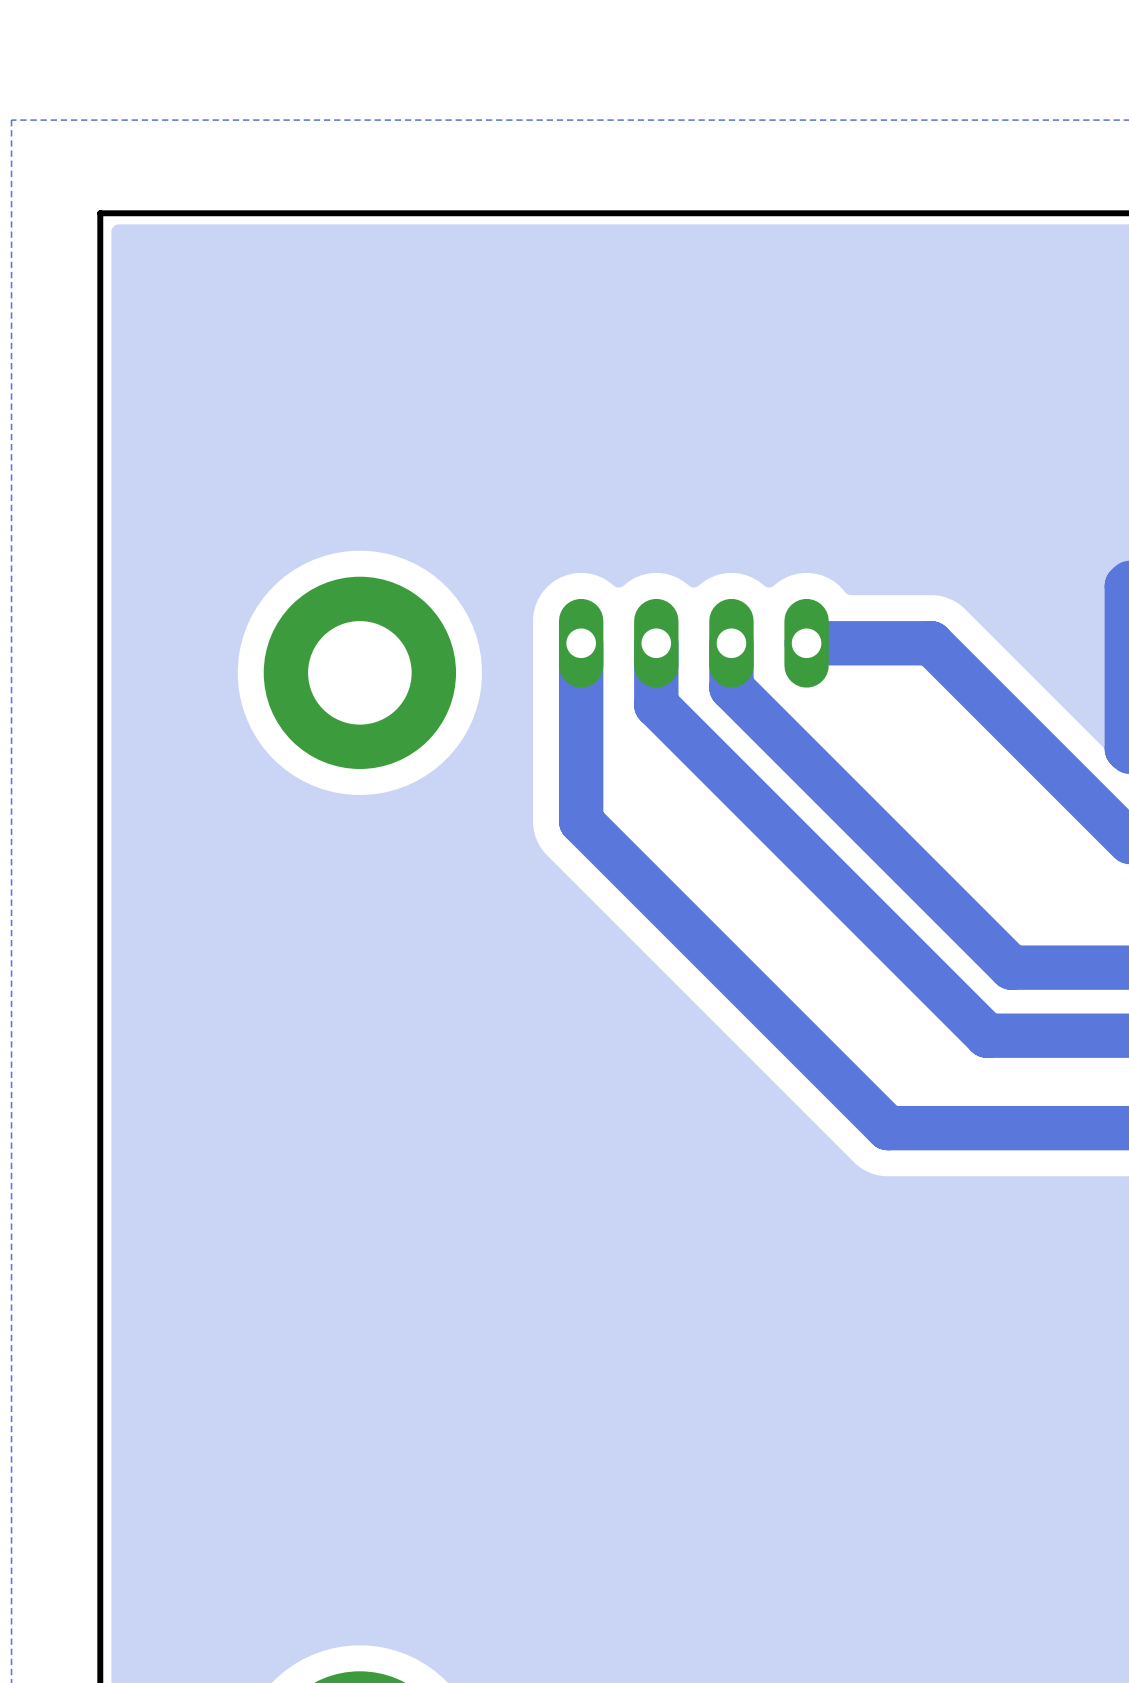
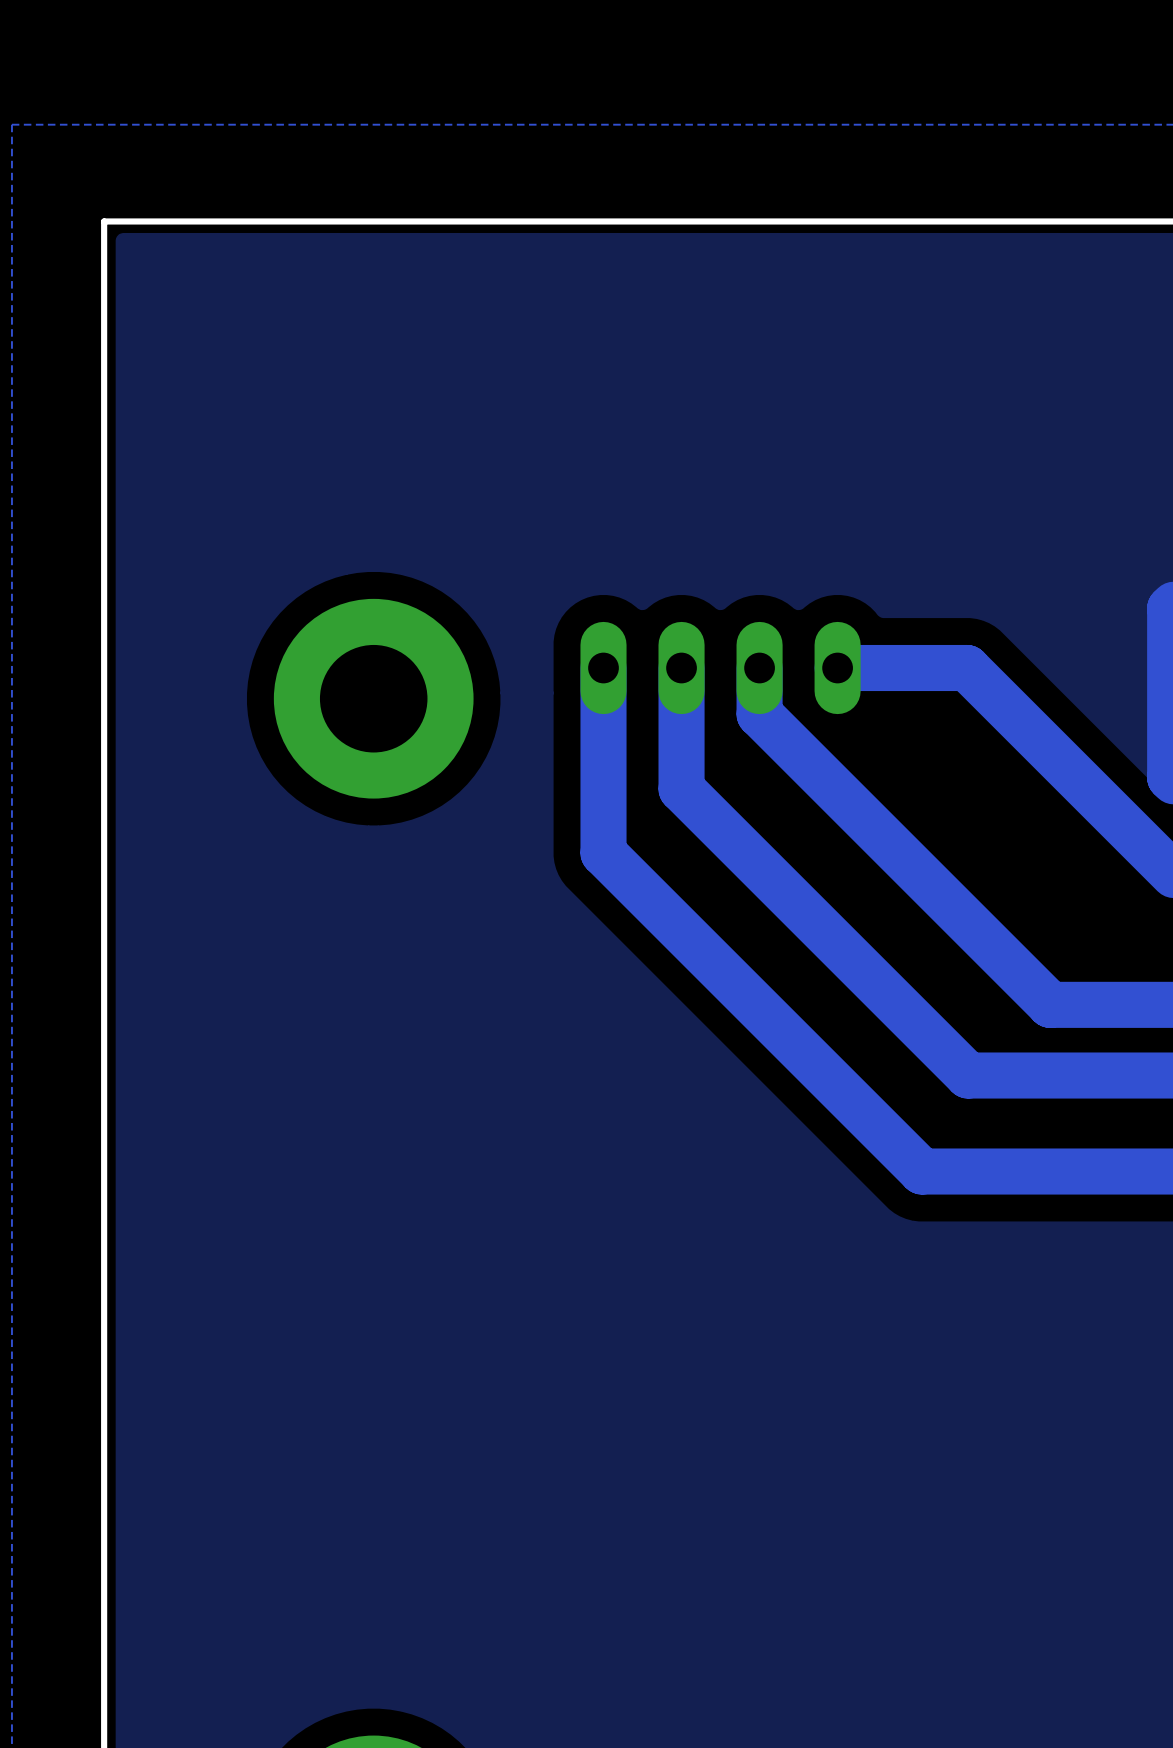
track: (656, 704) (987, 1035) -> (681, 732) (681, 788) (968, 1075) (1025, 1075)

